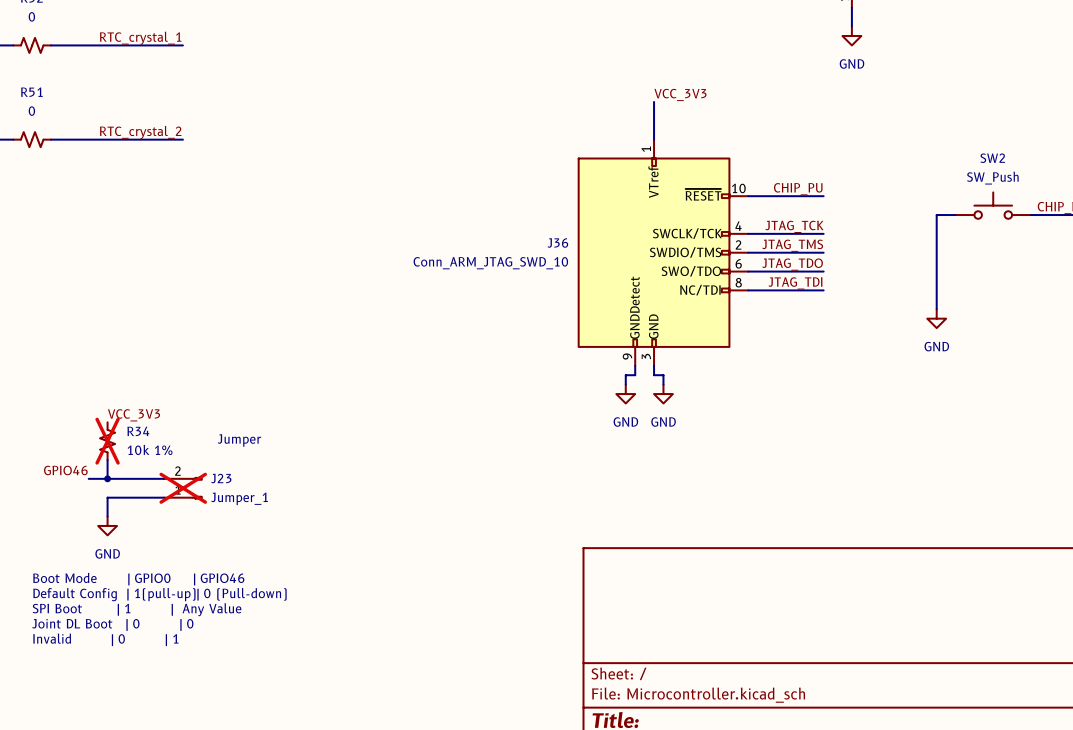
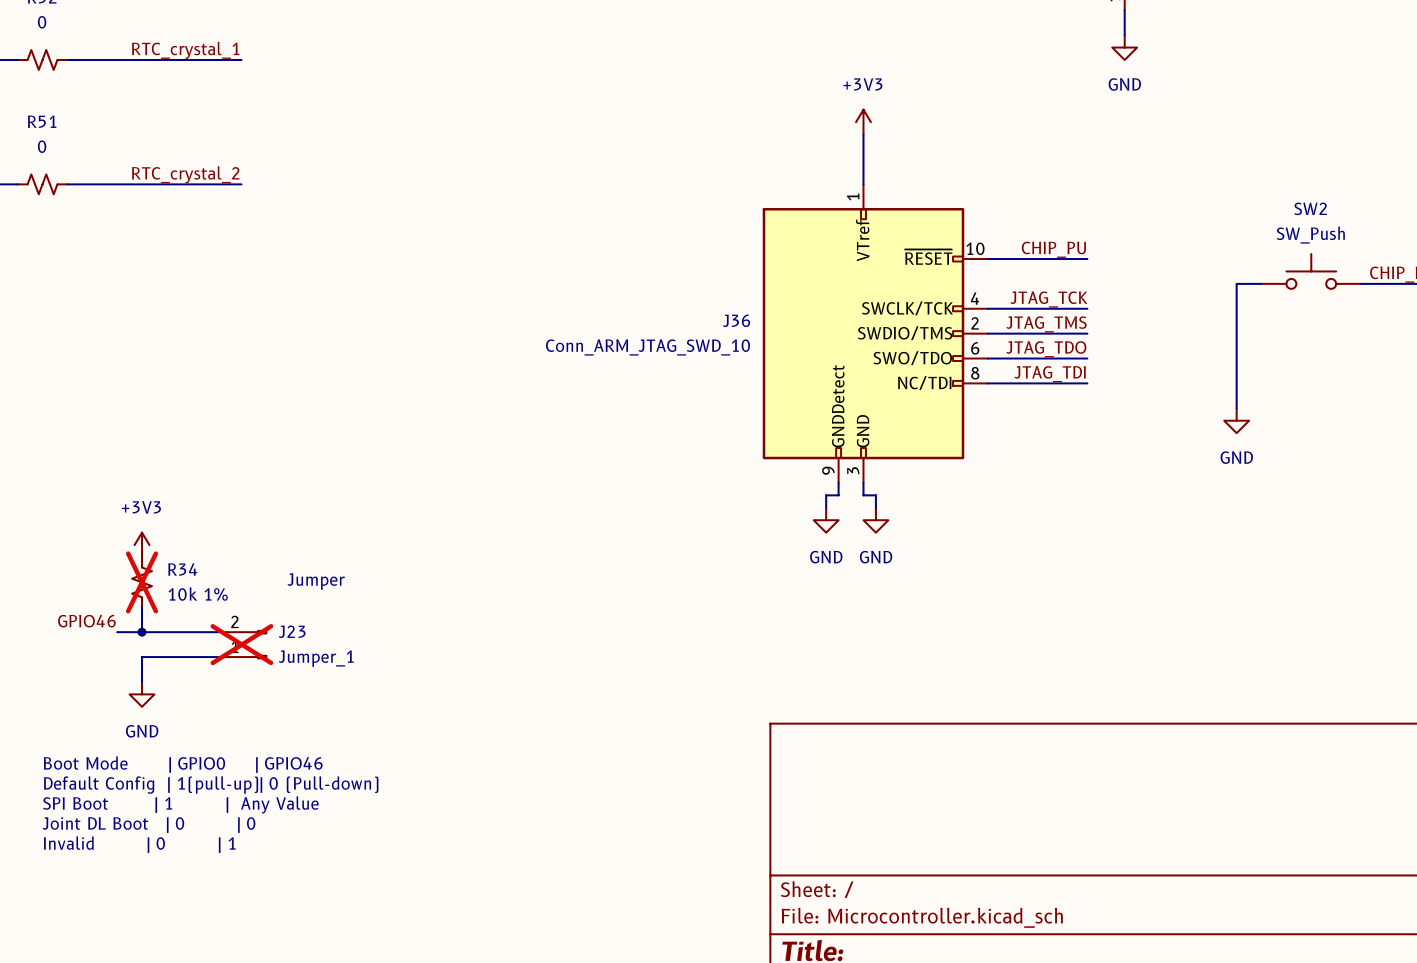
power symbol: none -> +3V3 (863, 122)
label: VCC_3V3 (680, 94) -> none
power symbol: none -> +3V3 (142, 545)
label: VCC_3V3 (133, 415) -> none

